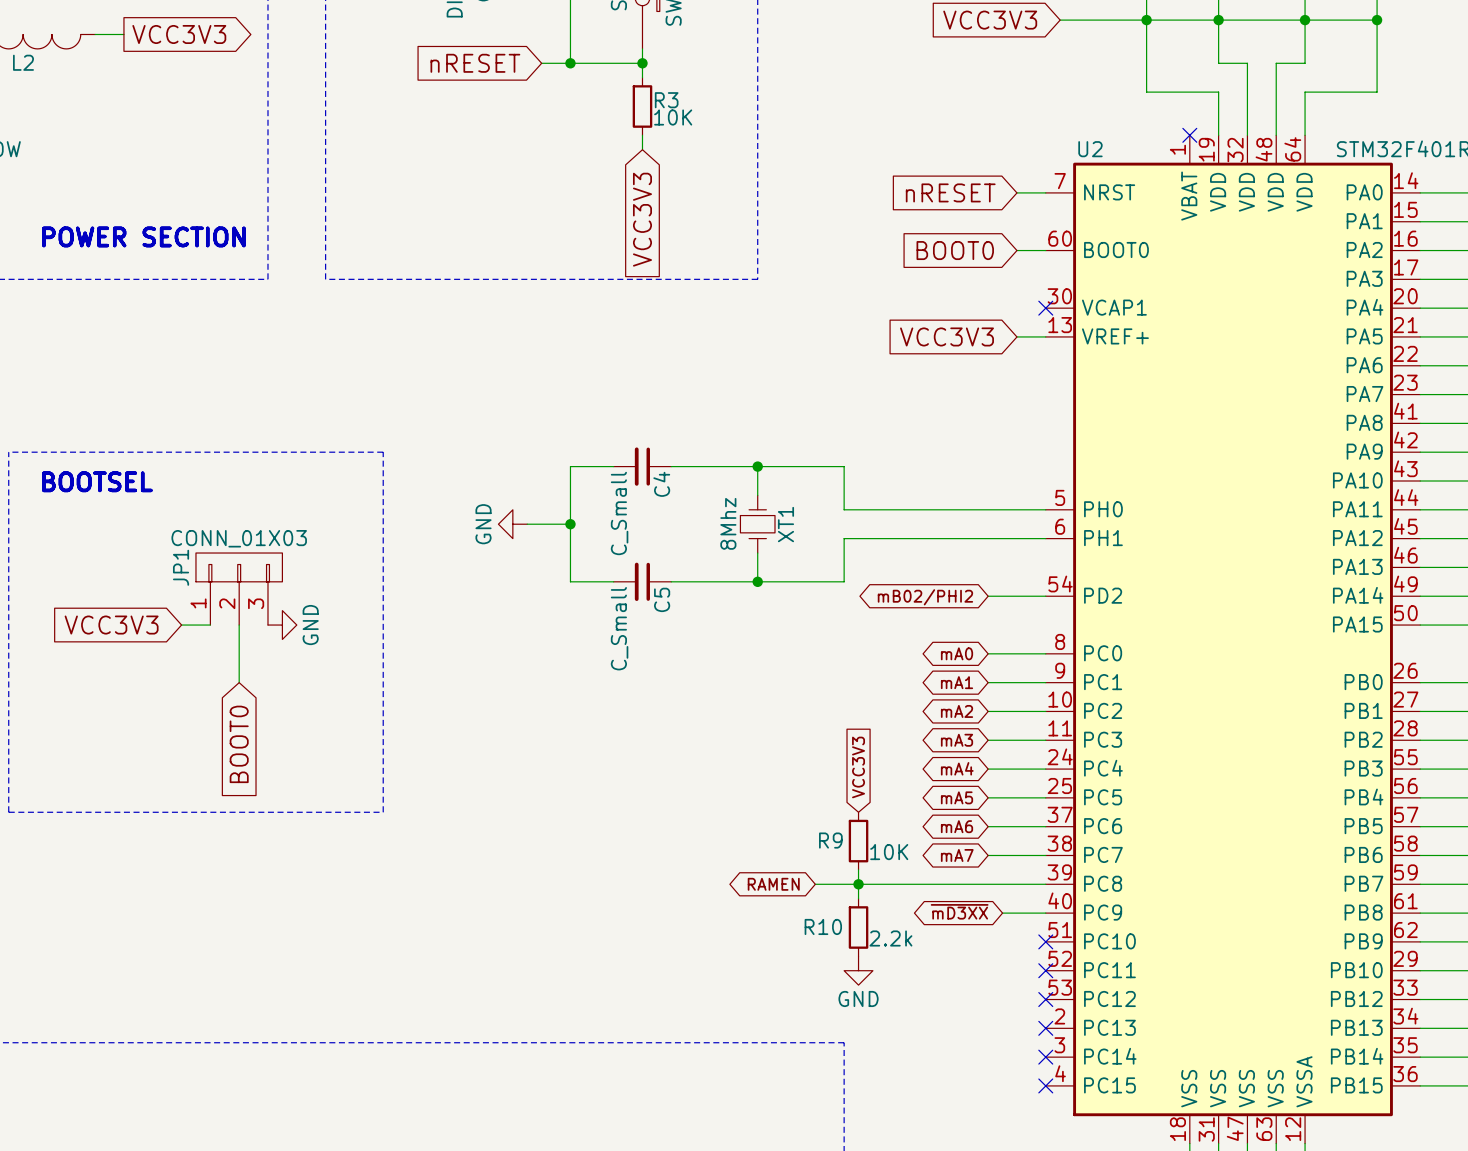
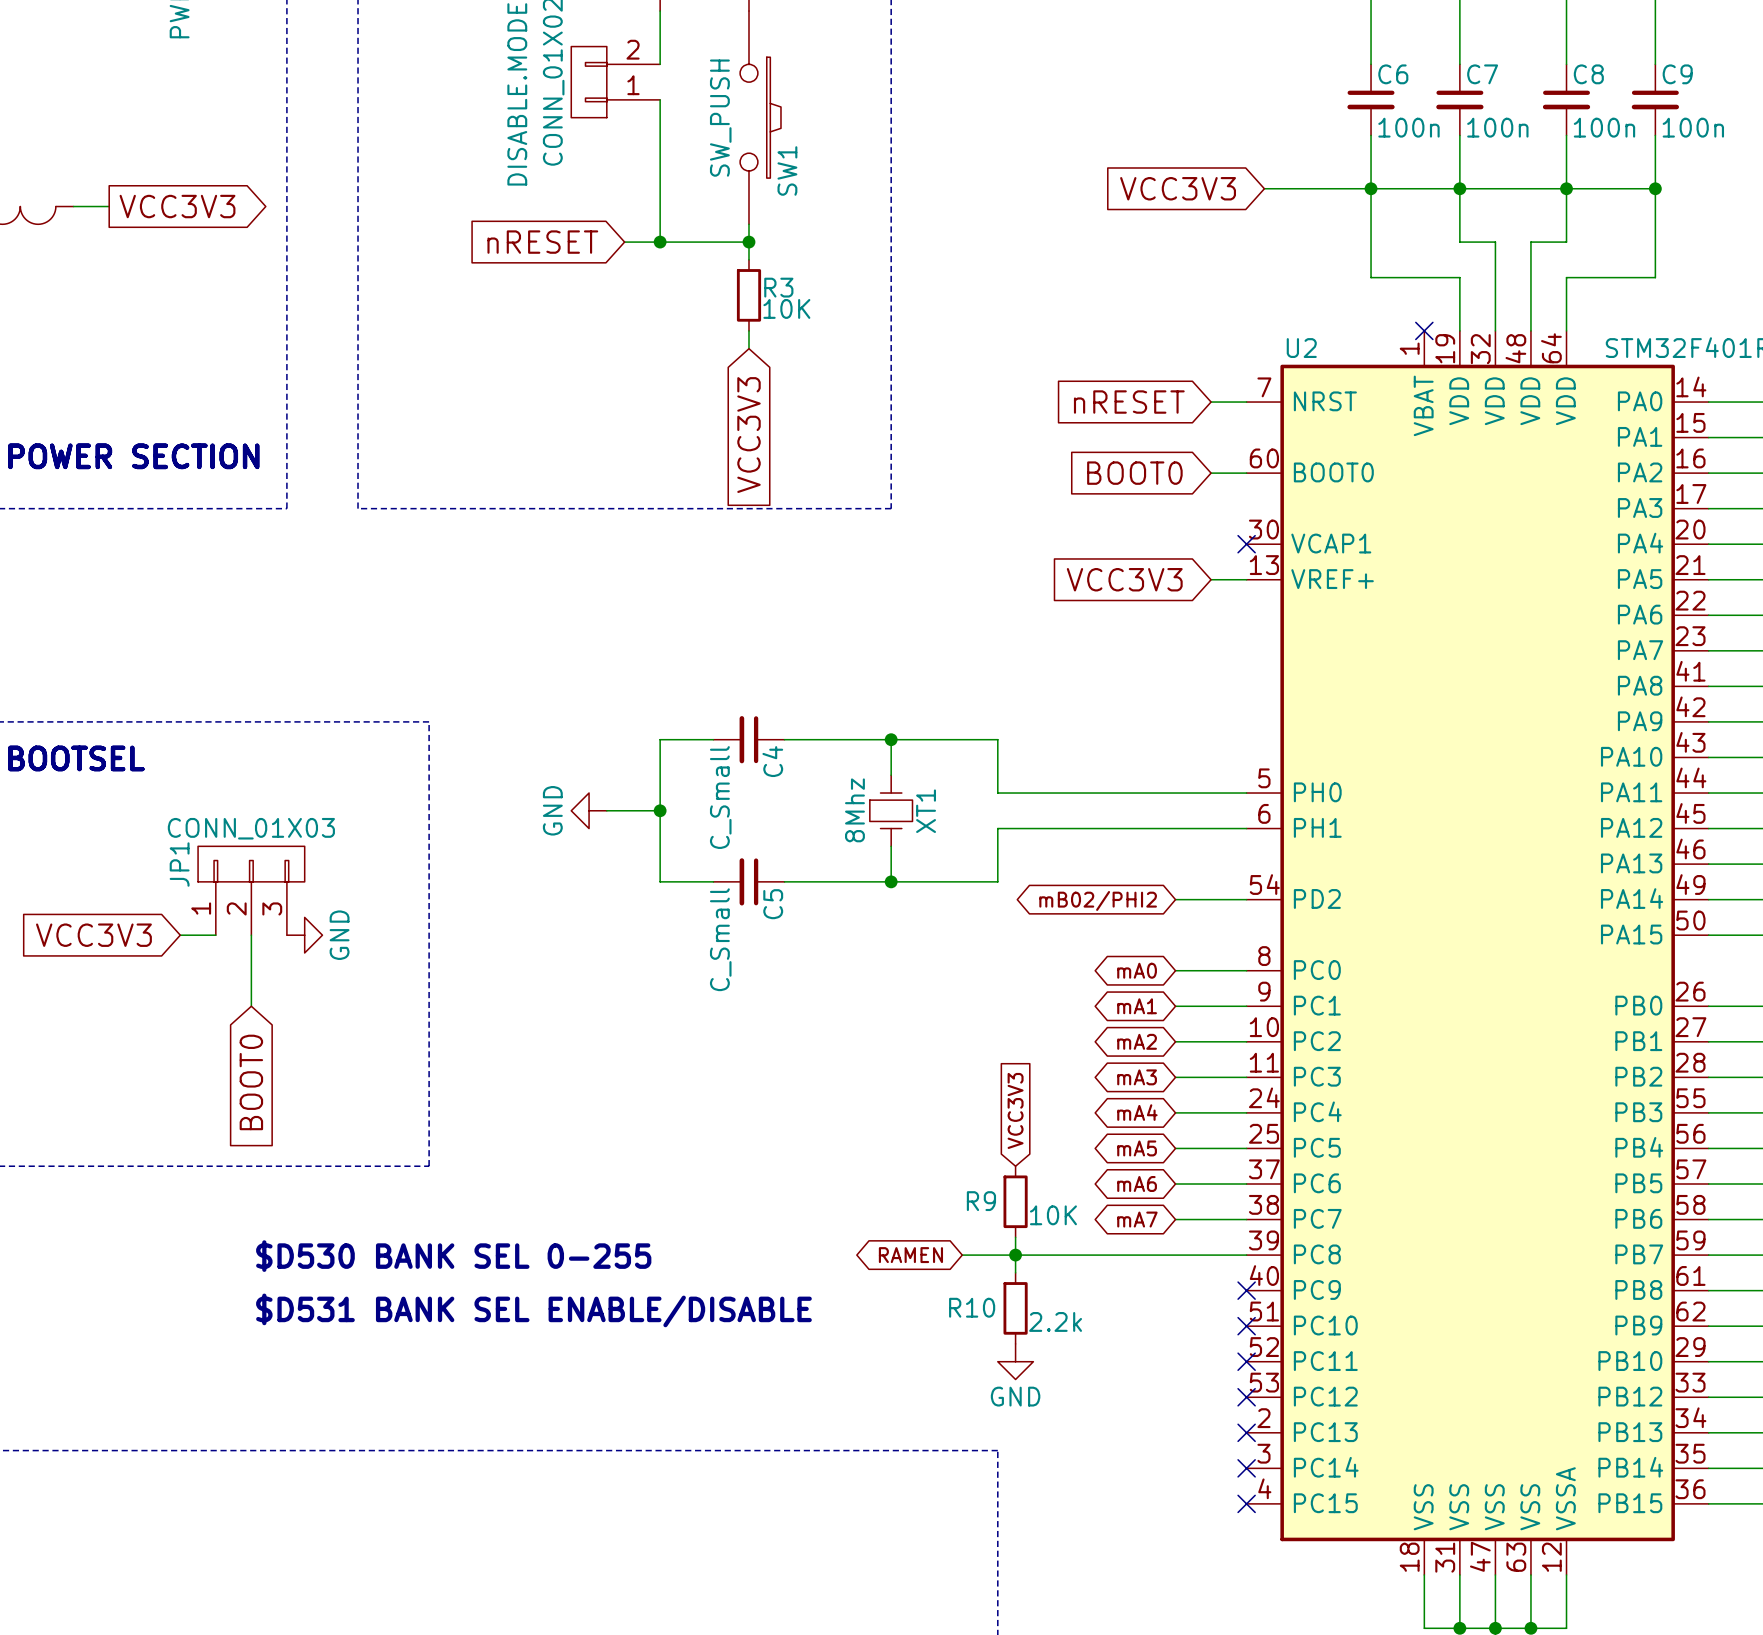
text: none -> $D530 BANK SEL 0-255 (453, 1256)
global label: ~{mD3XX} (959, 911) -> none
wire: (1002, 913) (1045, 913) -> none
no-connect mark: none -> (1246, 1290)
text: none -> $D531 BANK SEL ENABLE/DISABLE (533, 1310)

